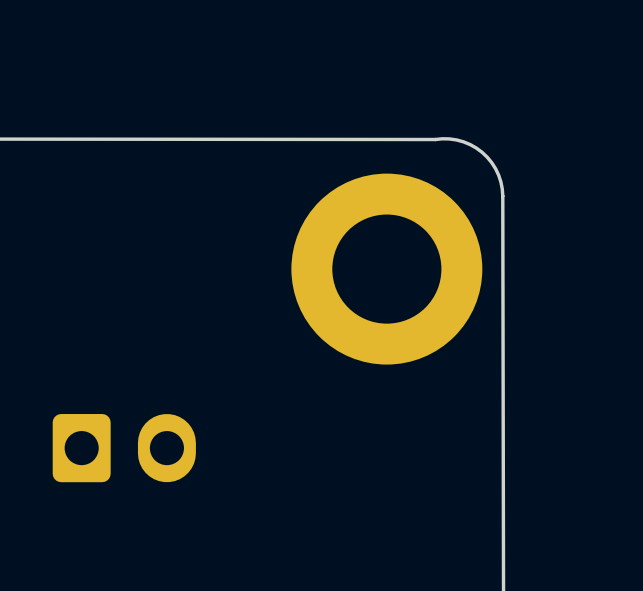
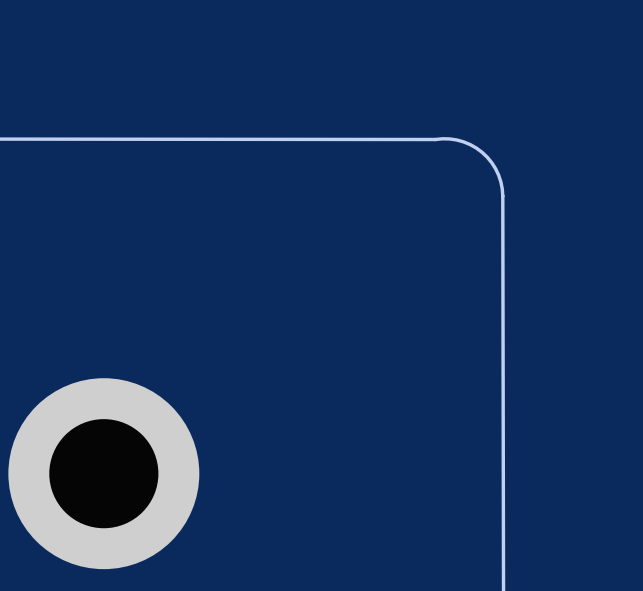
part: (386, 269) -> none
part footprint: [52, 414, 196, 483] -> [8, 378, 200, 570]

